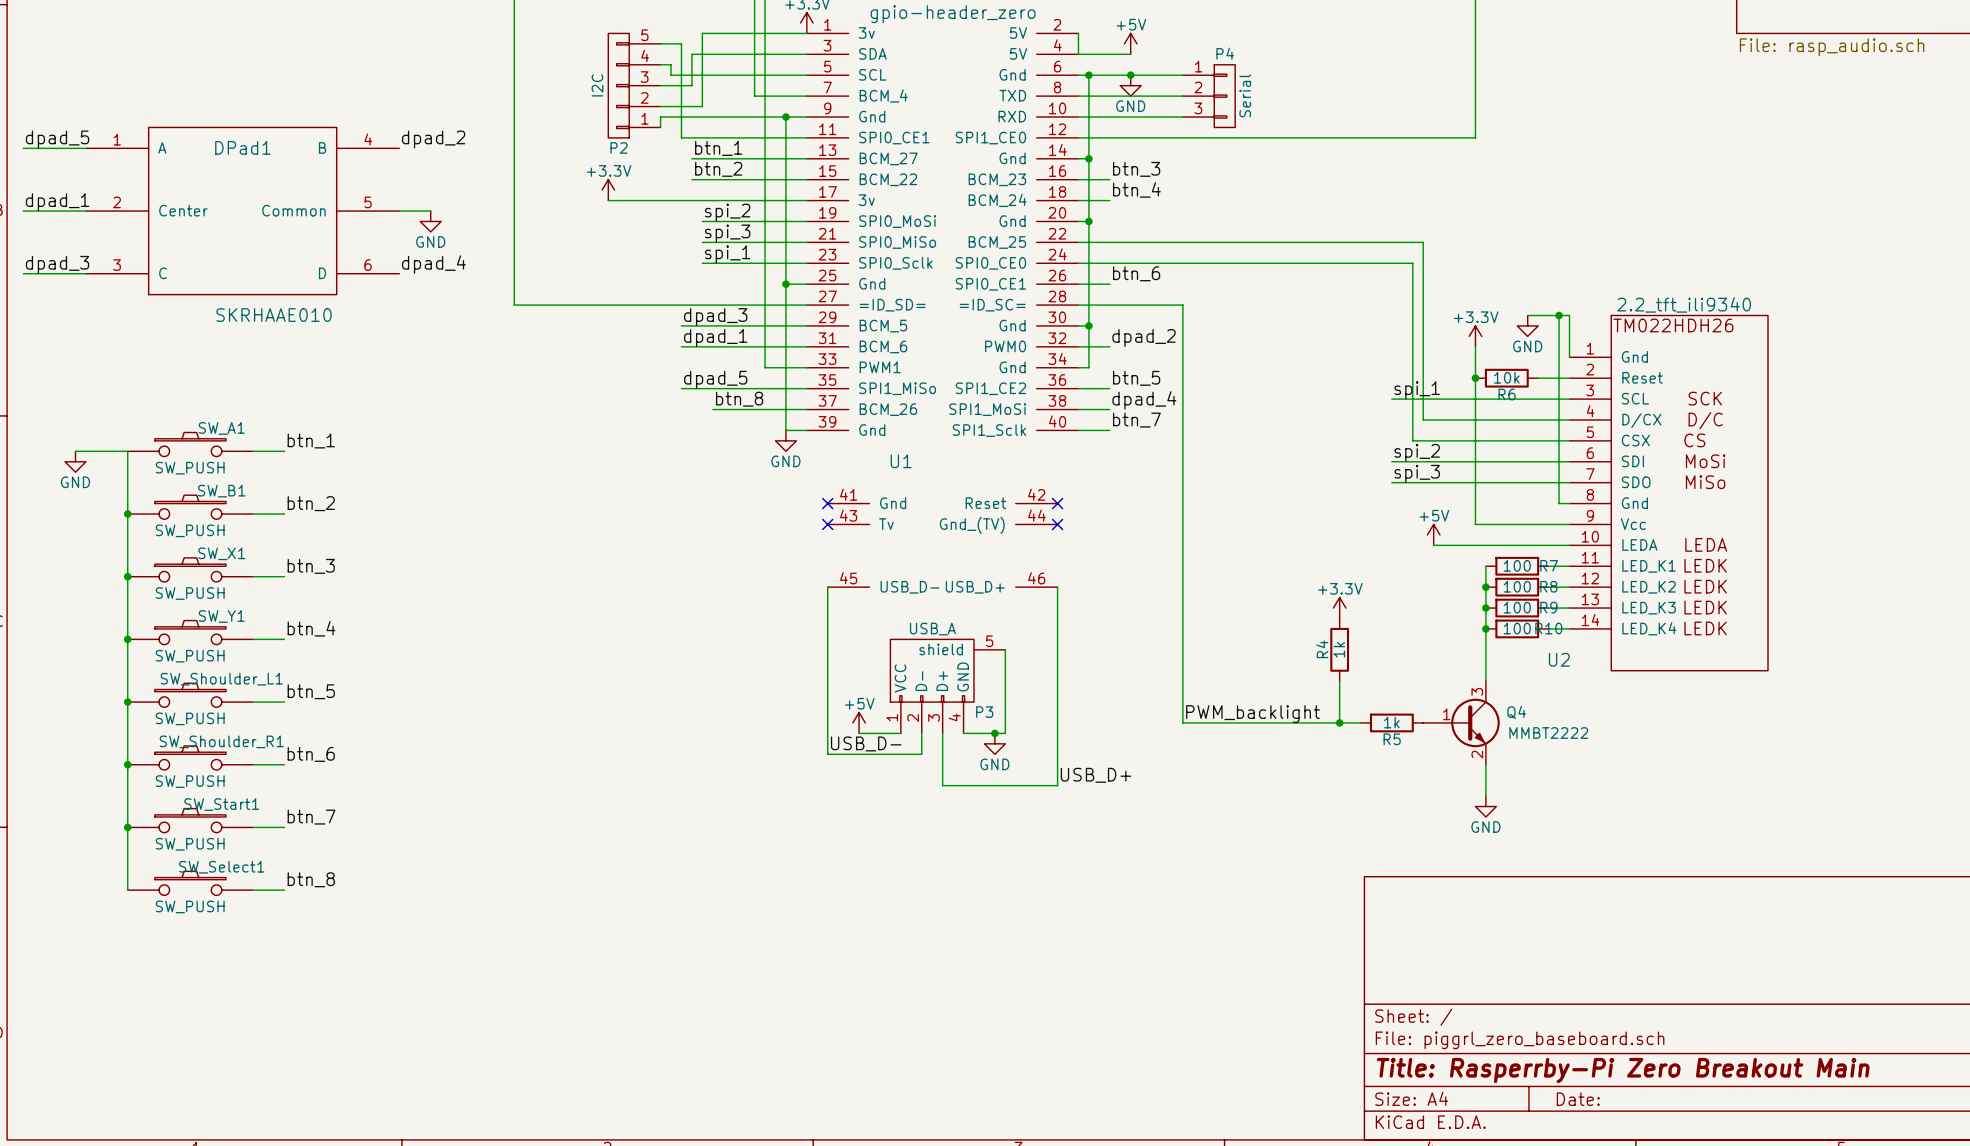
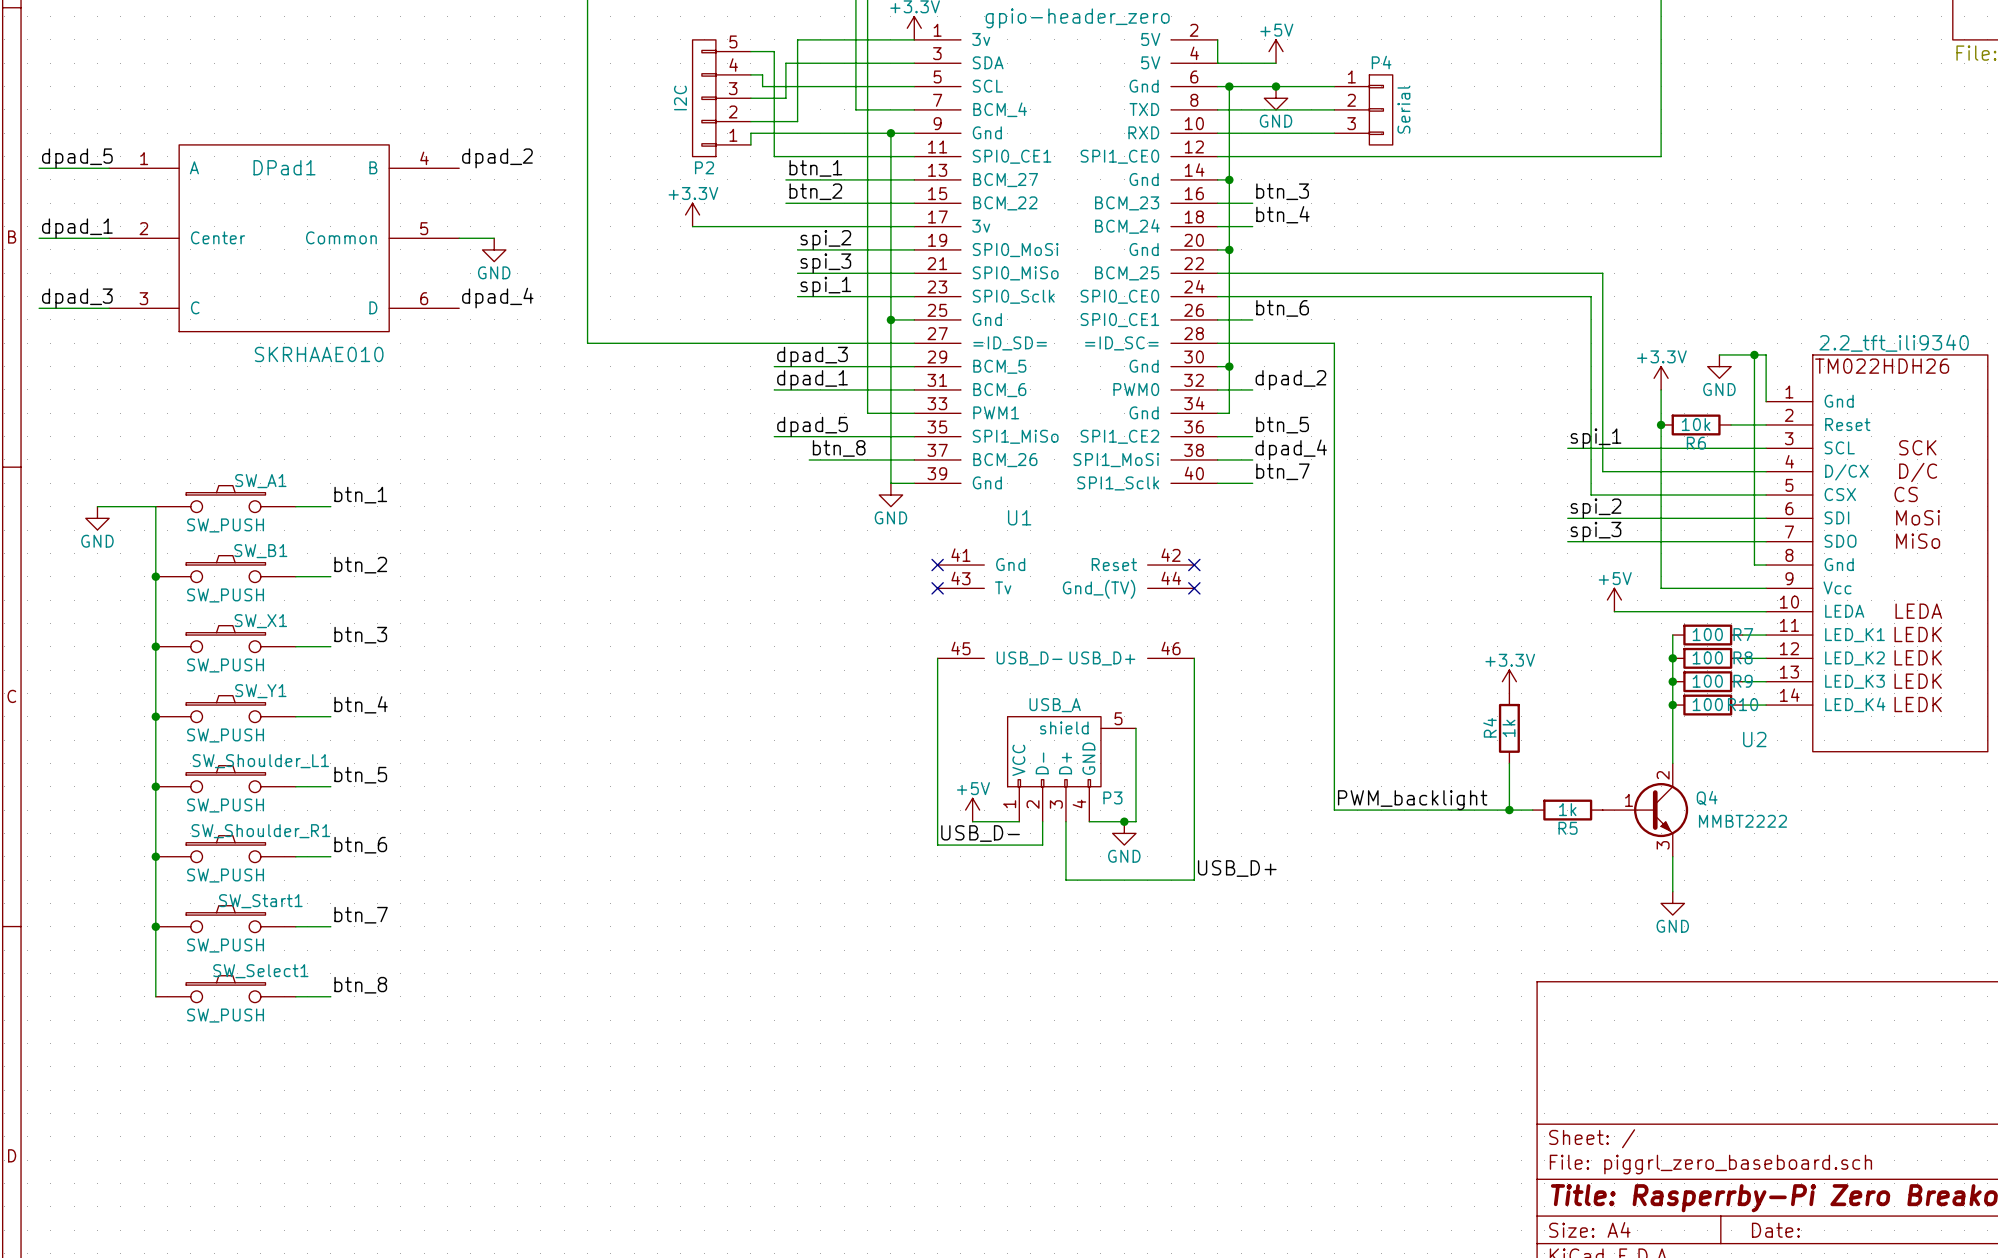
Q4 pin number: 3 (1477, 691) -> 2 (1663, 775)
Q4 pin number: 2 (1477, 754) -> 3 (1663, 845)

